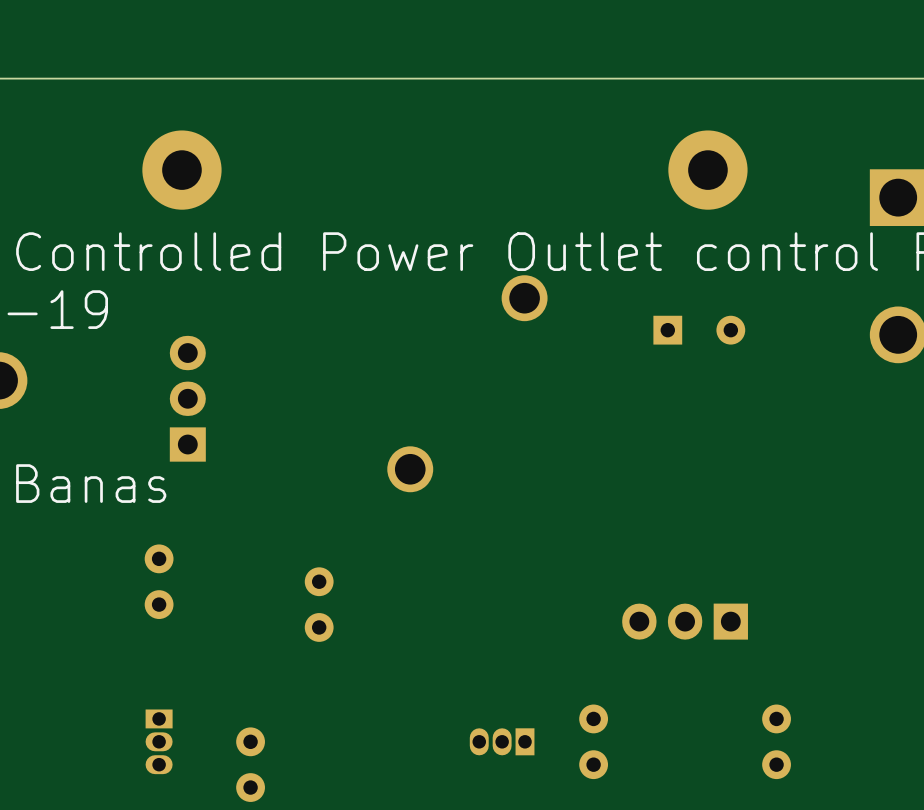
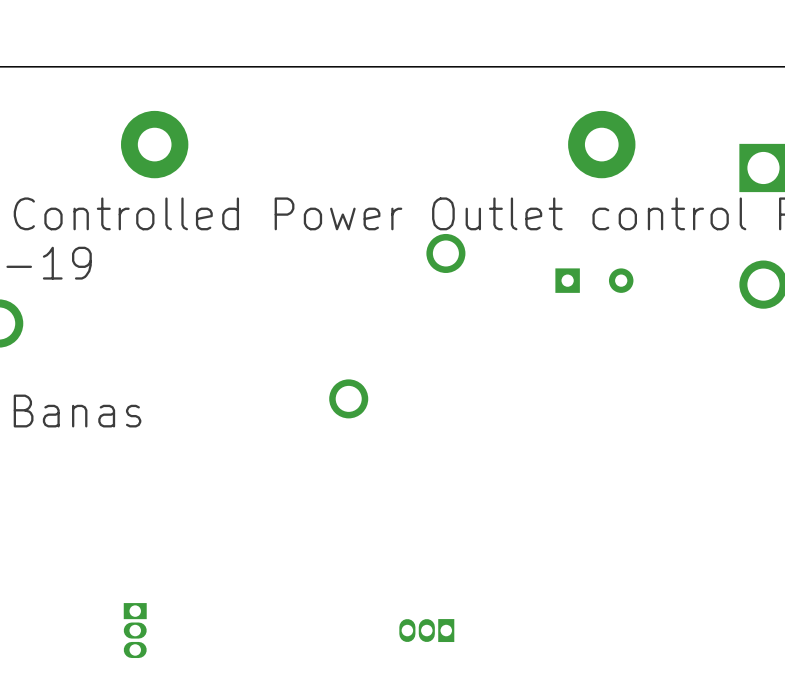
part: (187, 398) -> none
part: (159, 581) -> none
part: (319, 604) -> none
part: (685, 621) -> none
part: (593, 741) -> none
part: (776, 741) -> none
part: (250, 764) -> none

